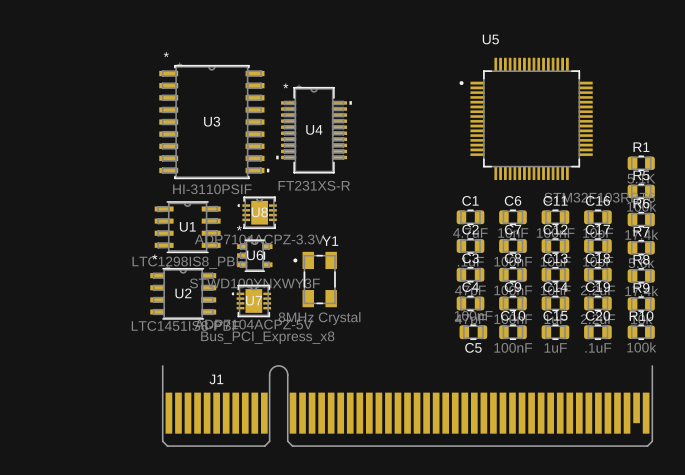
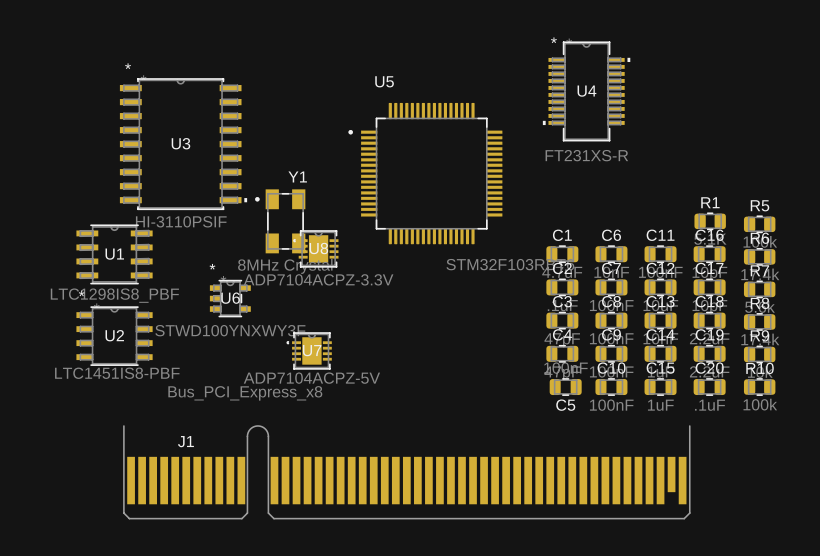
U5 position: (526, 118) -> (425, 173)
U3 position: (214, 122) -> (183, 144)
U4 position: (314, 130) -> (586, 91)
R1 position: (641, 163) -> (710, 221)
U1 position: (187, 227) -> (114, 254)
U6 position: (254, 255) -> (230, 298)
Y1 position: (315, 279) -> (280, 221)
U2 position: (183, 293) -> (114, 336)
J1 position: (407, 405) -> (406, 472)

